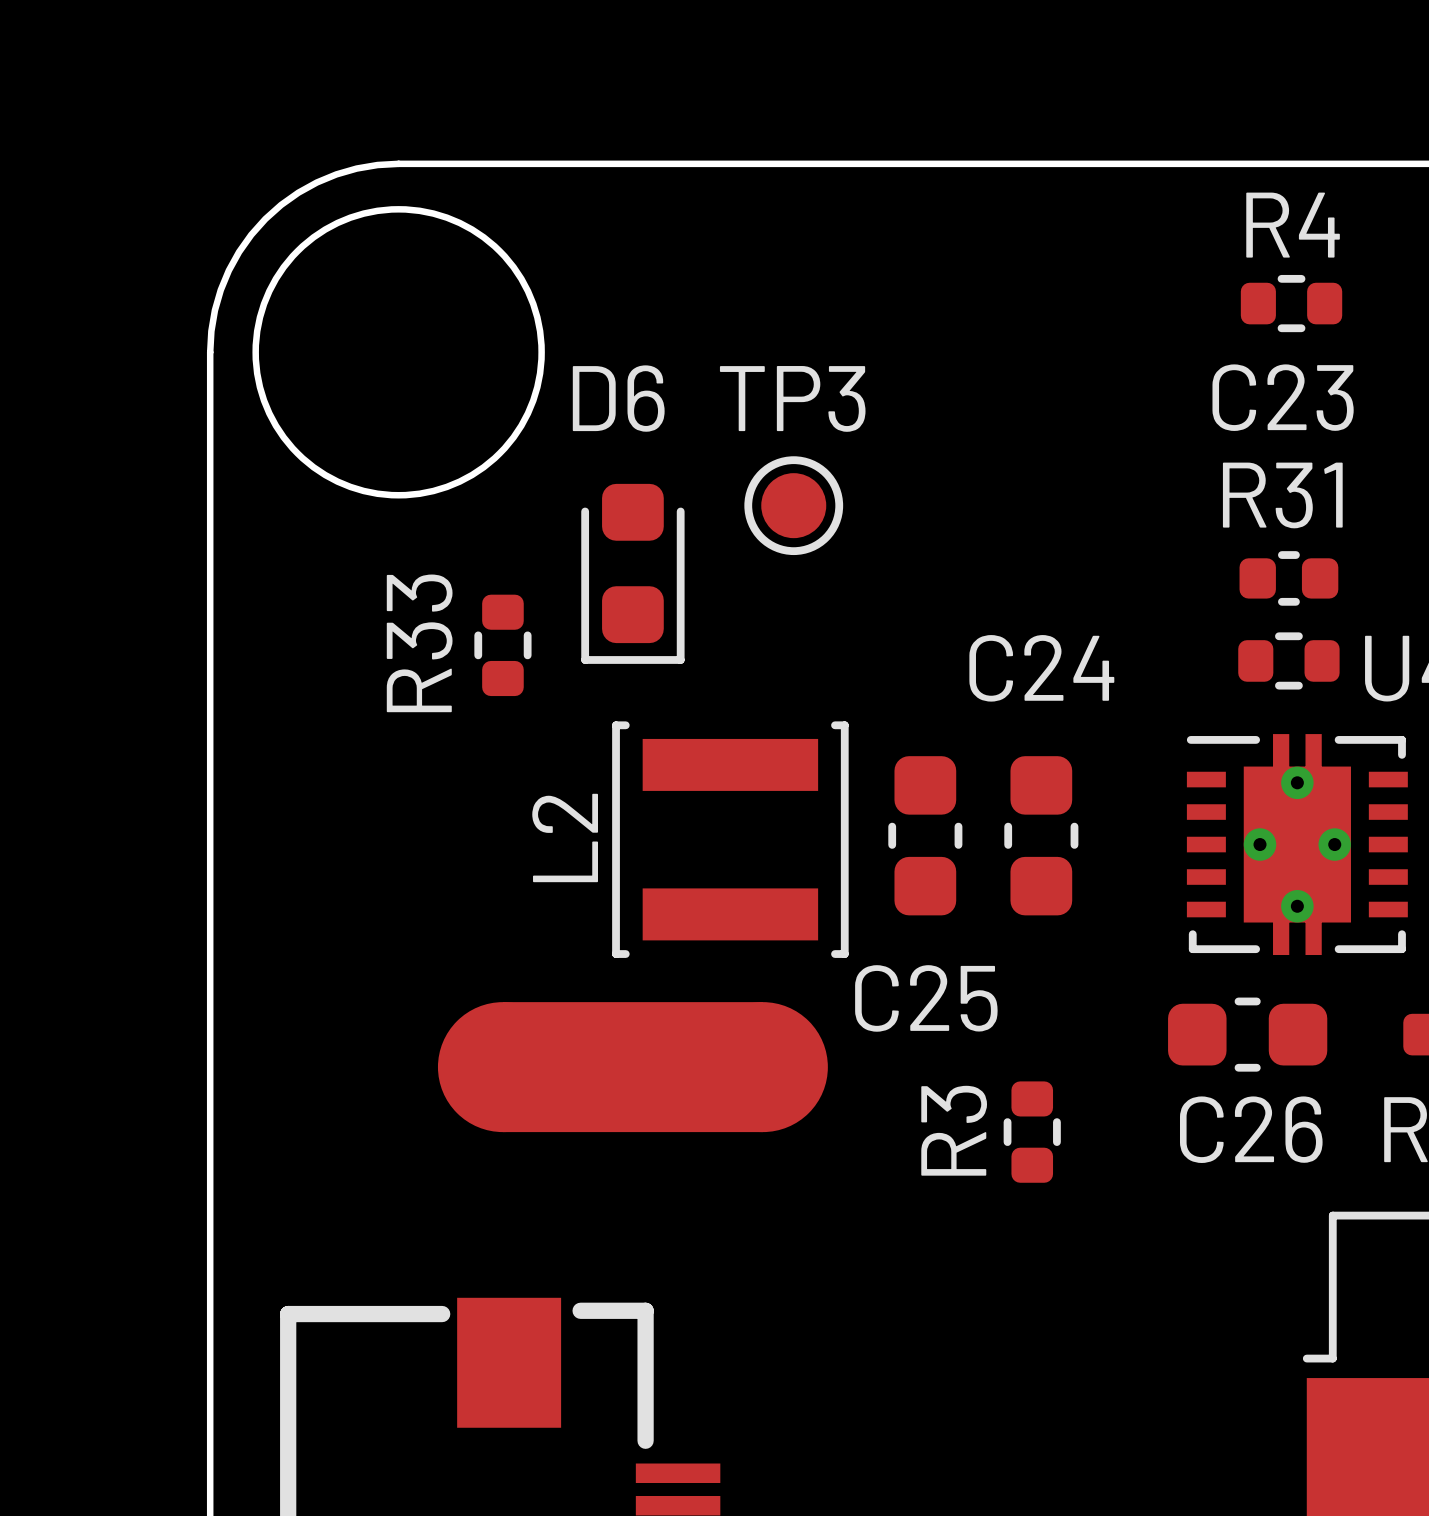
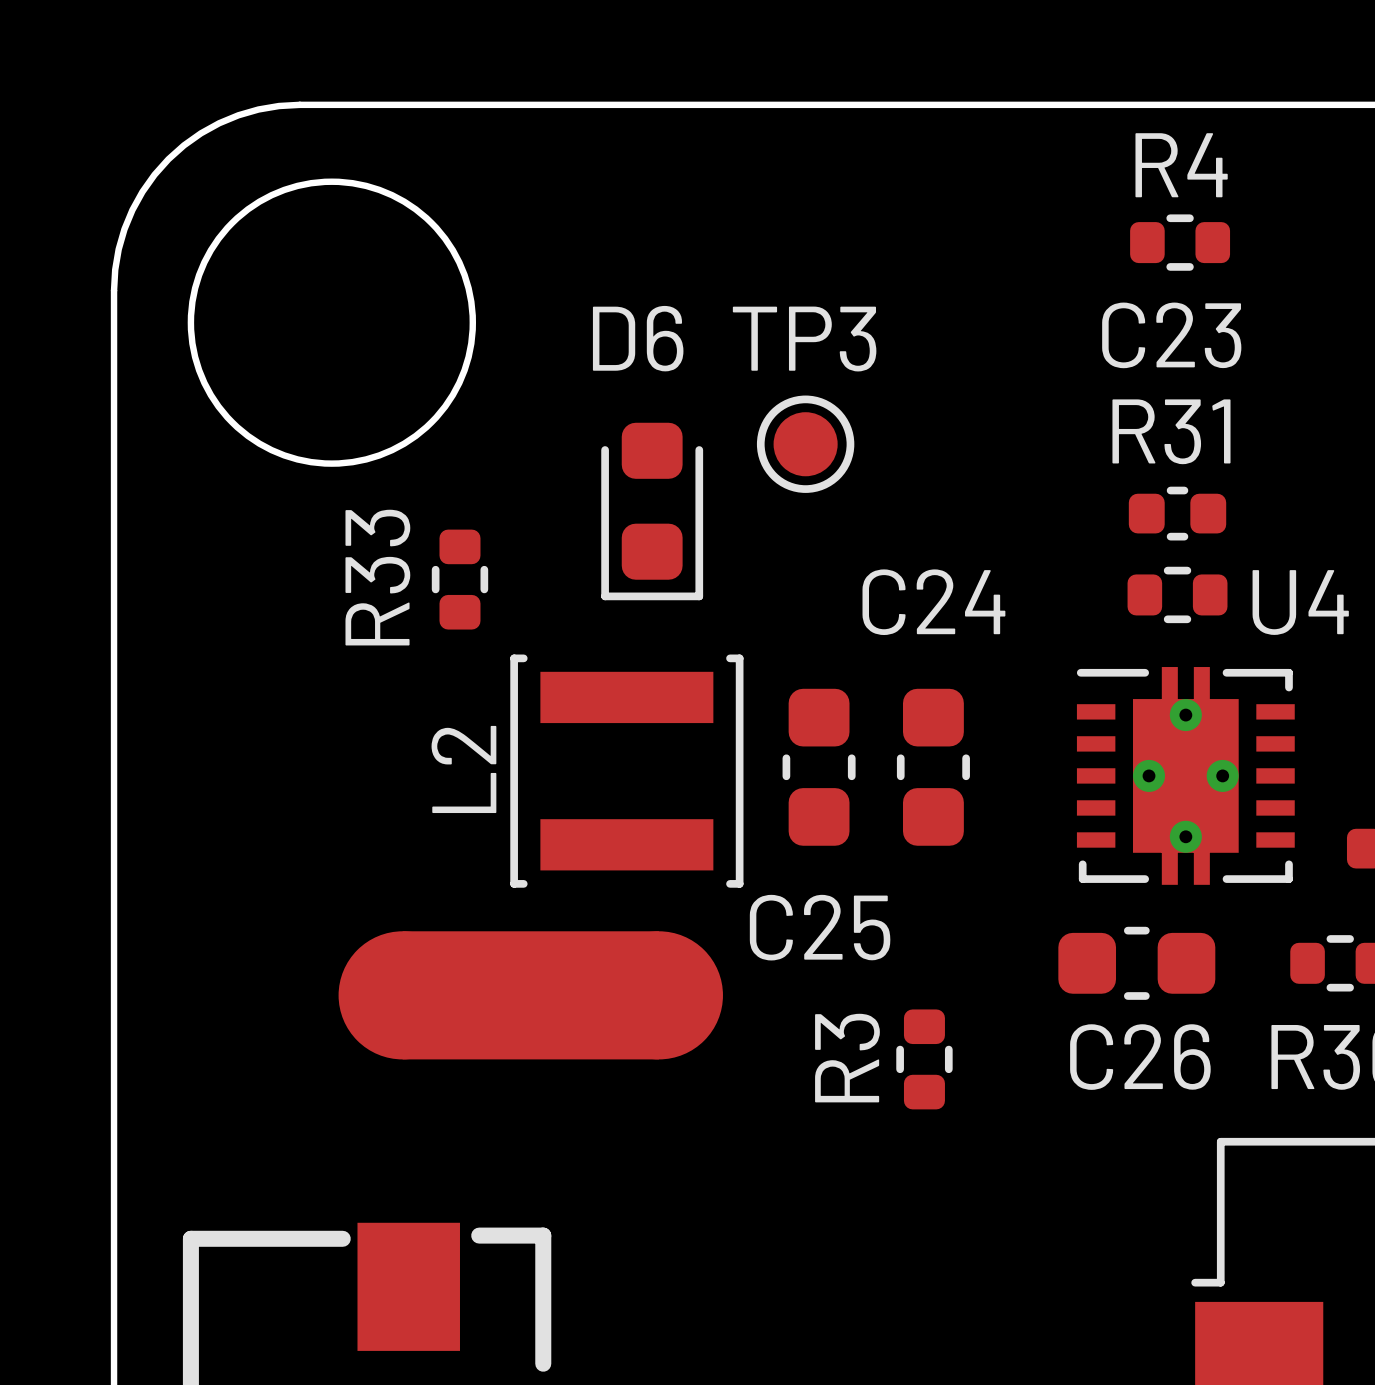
round board edge position: (398, 352) -> (331, 322)
TP3 position: (793, 505) -> (805, 444)
D6 position: (632, 573) -> (652, 511)
R33 position: (502, 645) -> (459, 579)

